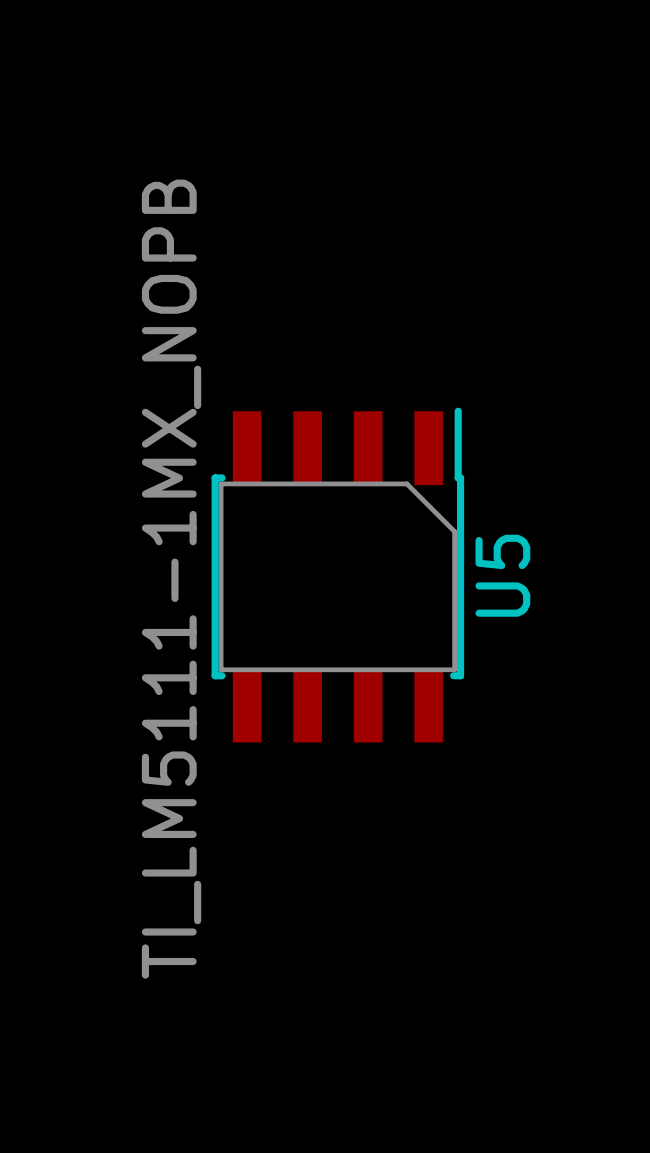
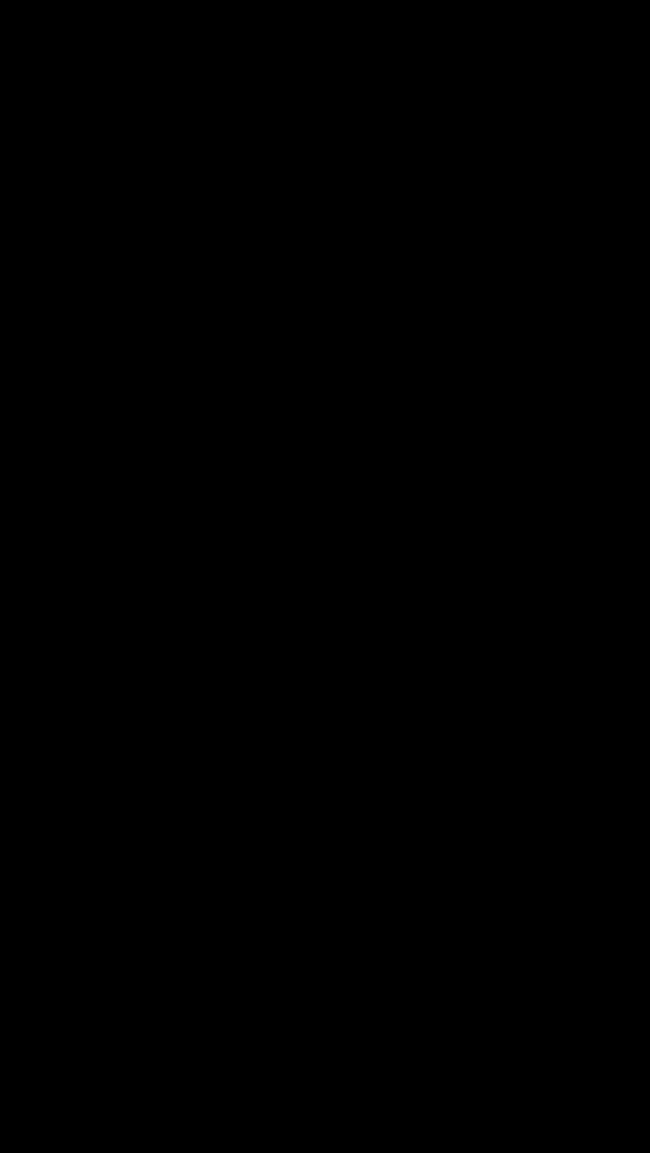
U5: TI_LM5111-1MX_NOPB (337, 575) -> none

